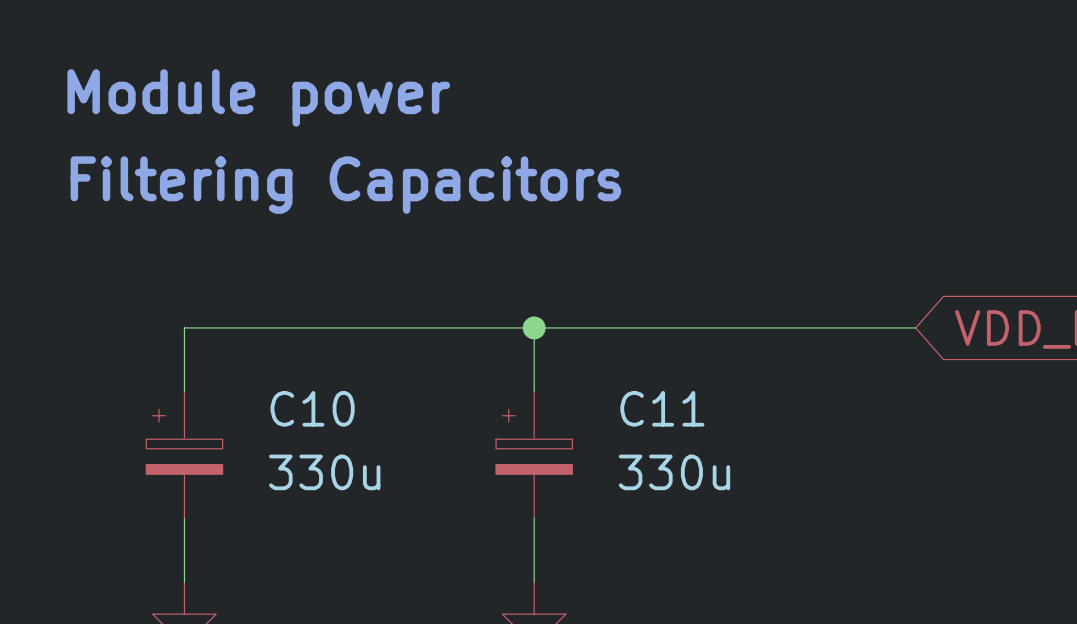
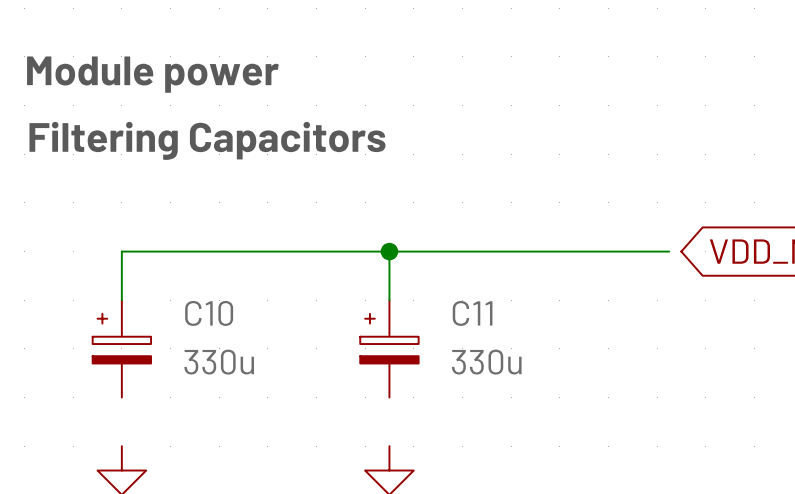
wire: (899, 327) (915, 327) -> none
wire: (184, 518) (184, 582) -> none
wire: (534, 518) (534, 582) -> none

